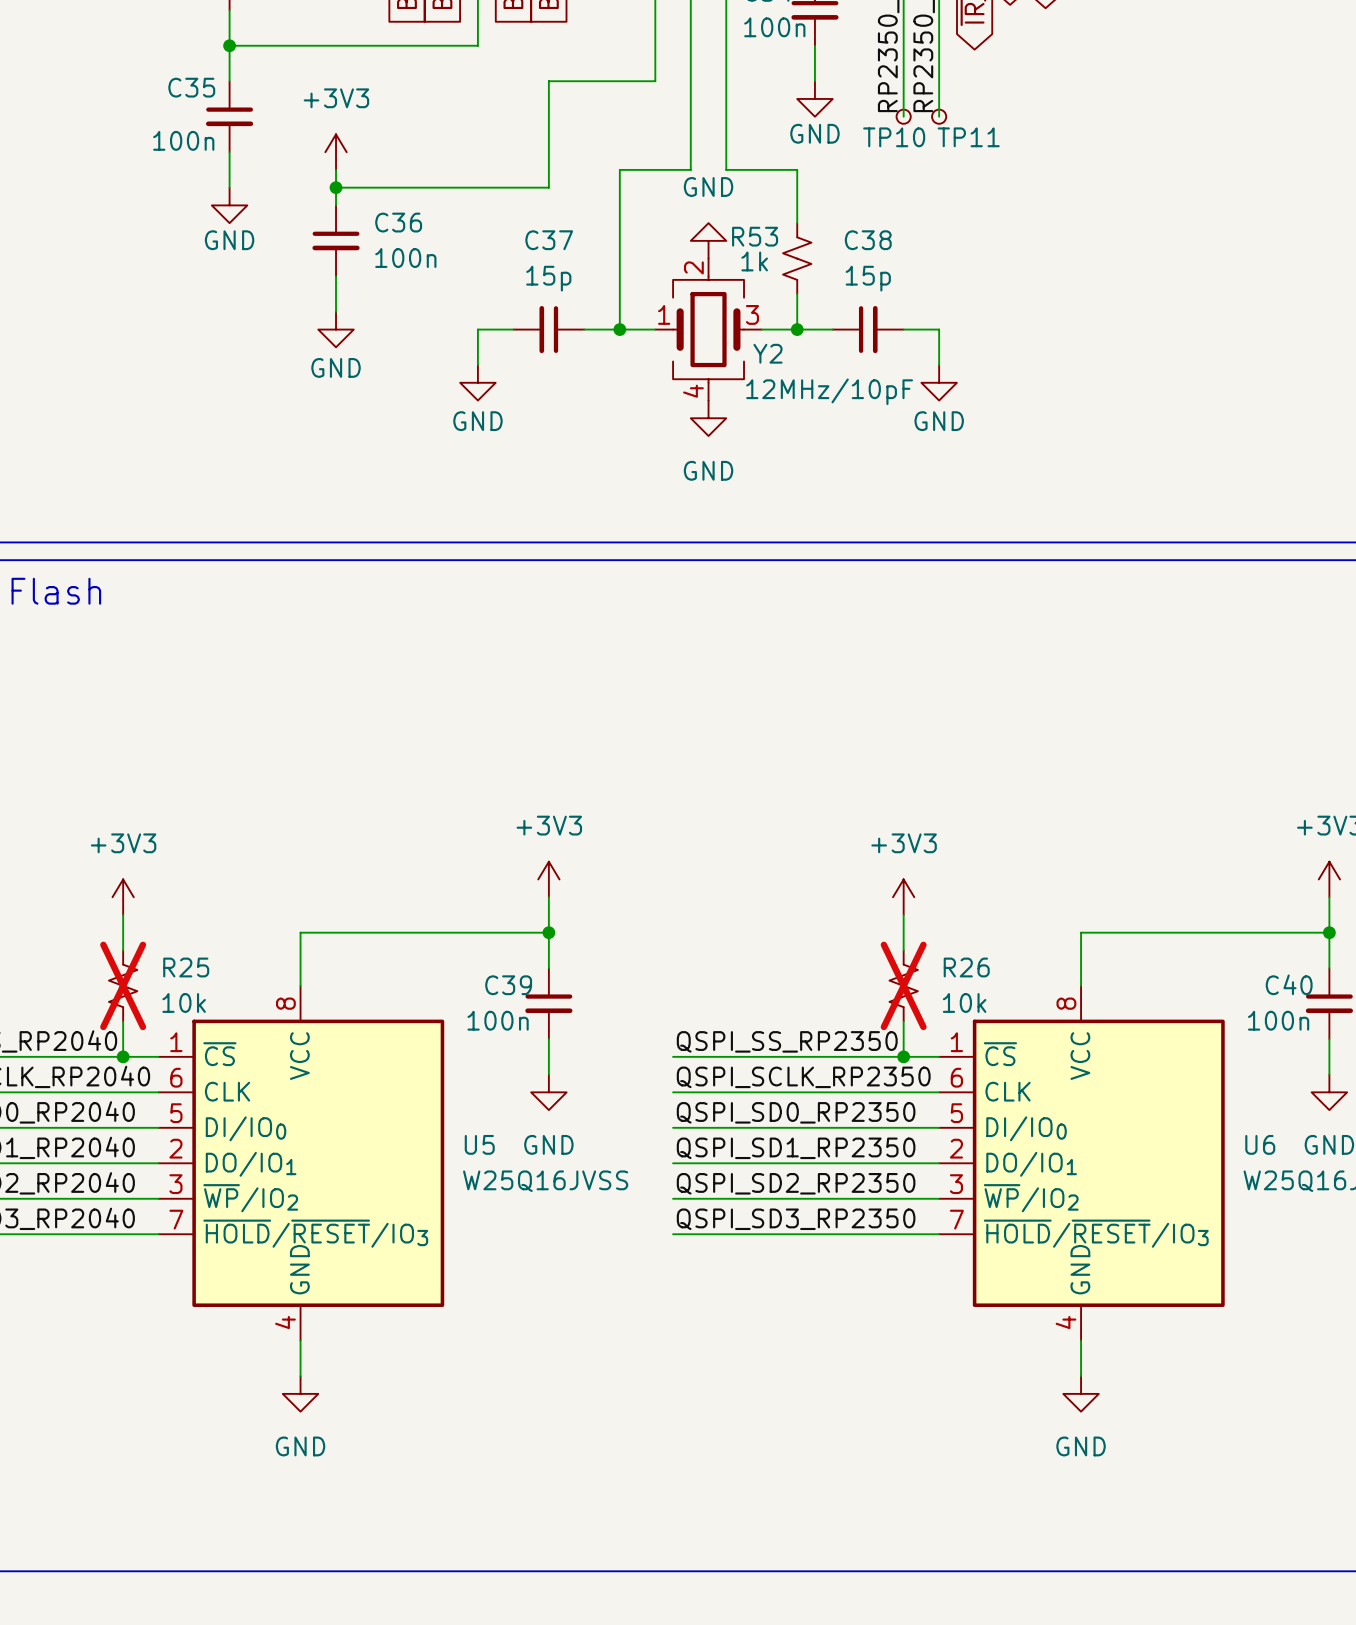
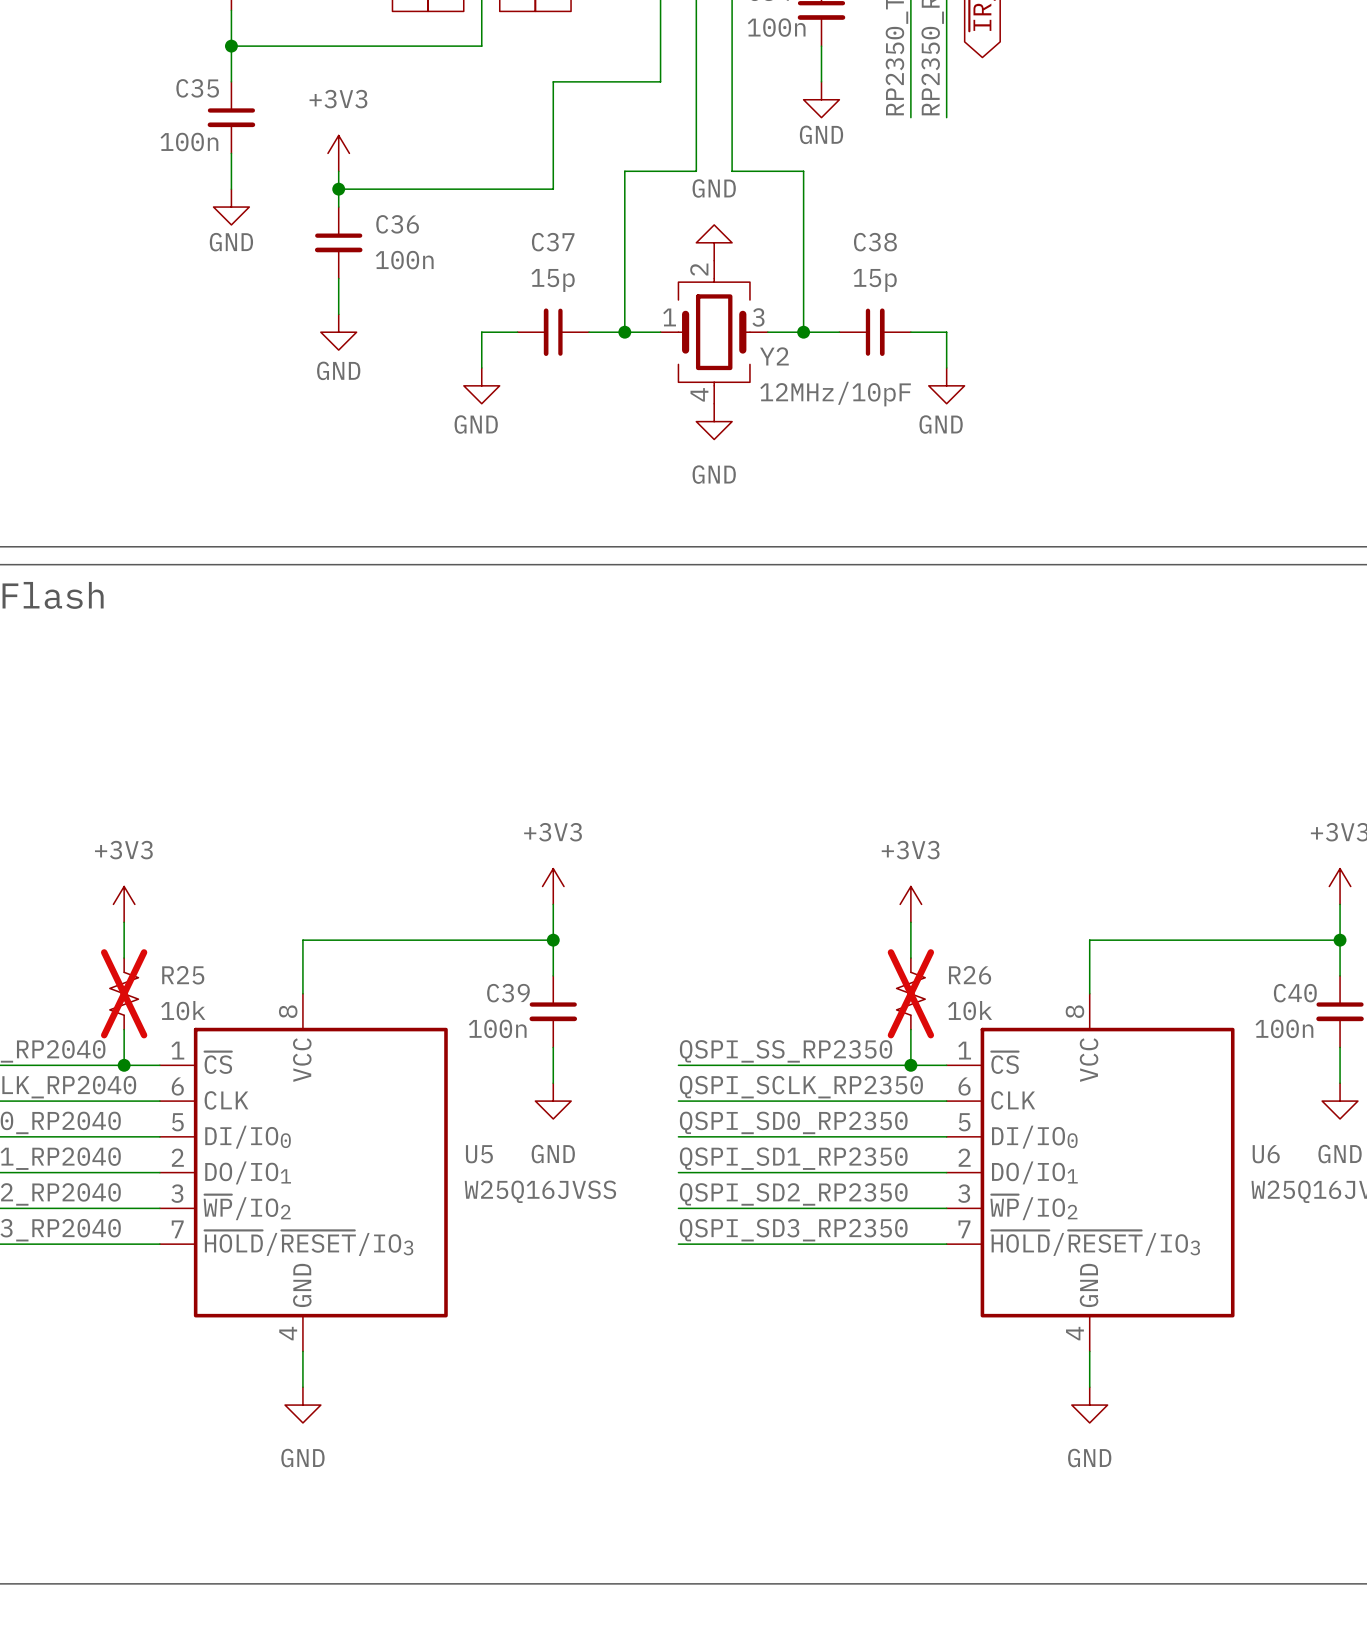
TP10: (903, 116) -> none
TP11: (939, 116) -> none
wire: none -> (803, 224) (803, 296)
R53: 1k (797, 258) -> none

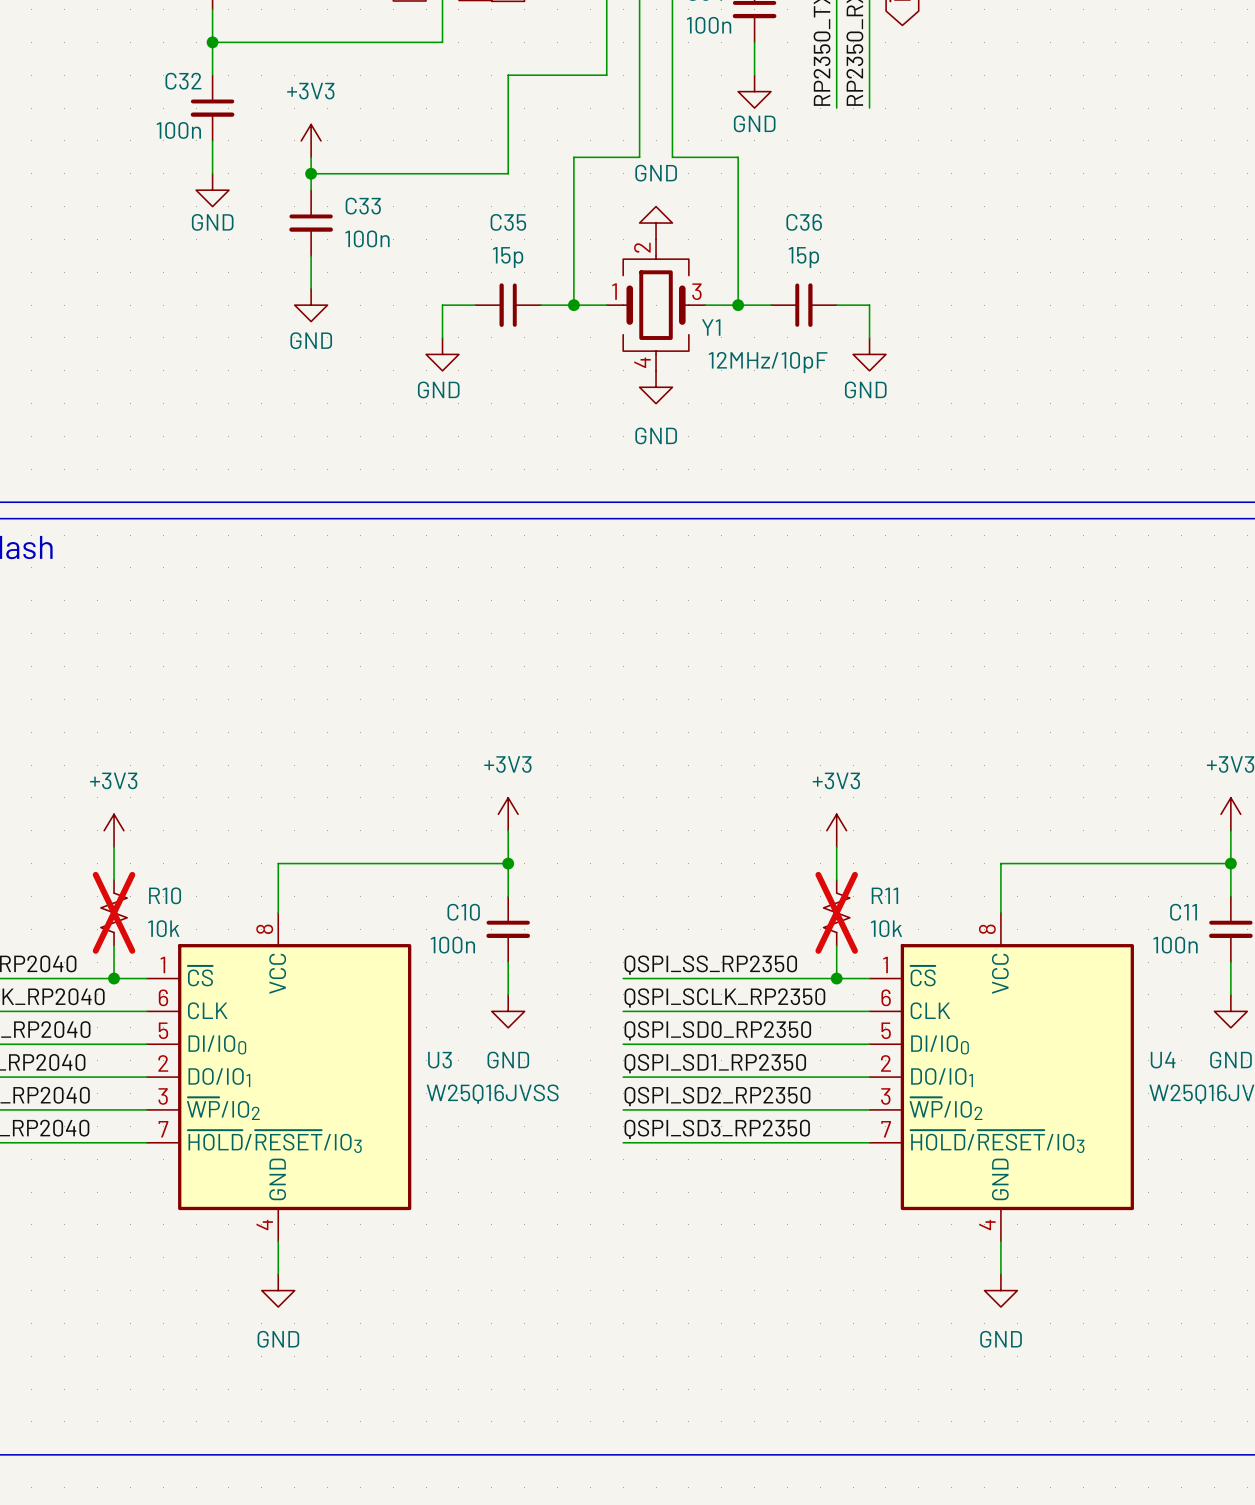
C35 name: C35 (197, 88) -> C32 (183, 81)
C36 name: C36 (397, 224) -> C33 (363, 206)
C37 name: C37 (553, 242) -> C35 (508, 222)
C38 name: C38 (875, 242) -> C36 (804, 222)
Y2 name: Y2 (774, 356) -> Y1 (711, 327)
R25 name: R25 (183, 975) -> R10 (165, 895)
R26 name: R26 (970, 975) -> R11 (884, 895)
C39 name: C39 (508, 993) -> C10 (463, 912)
C40 name: C40 (1295, 993) -> C11 (1183, 912)
U5 name: U5 (479, 1154) -> U3 (439, 1060)
U6 name: U6 (1266, 1154) -> U4 (1163, 1060)

